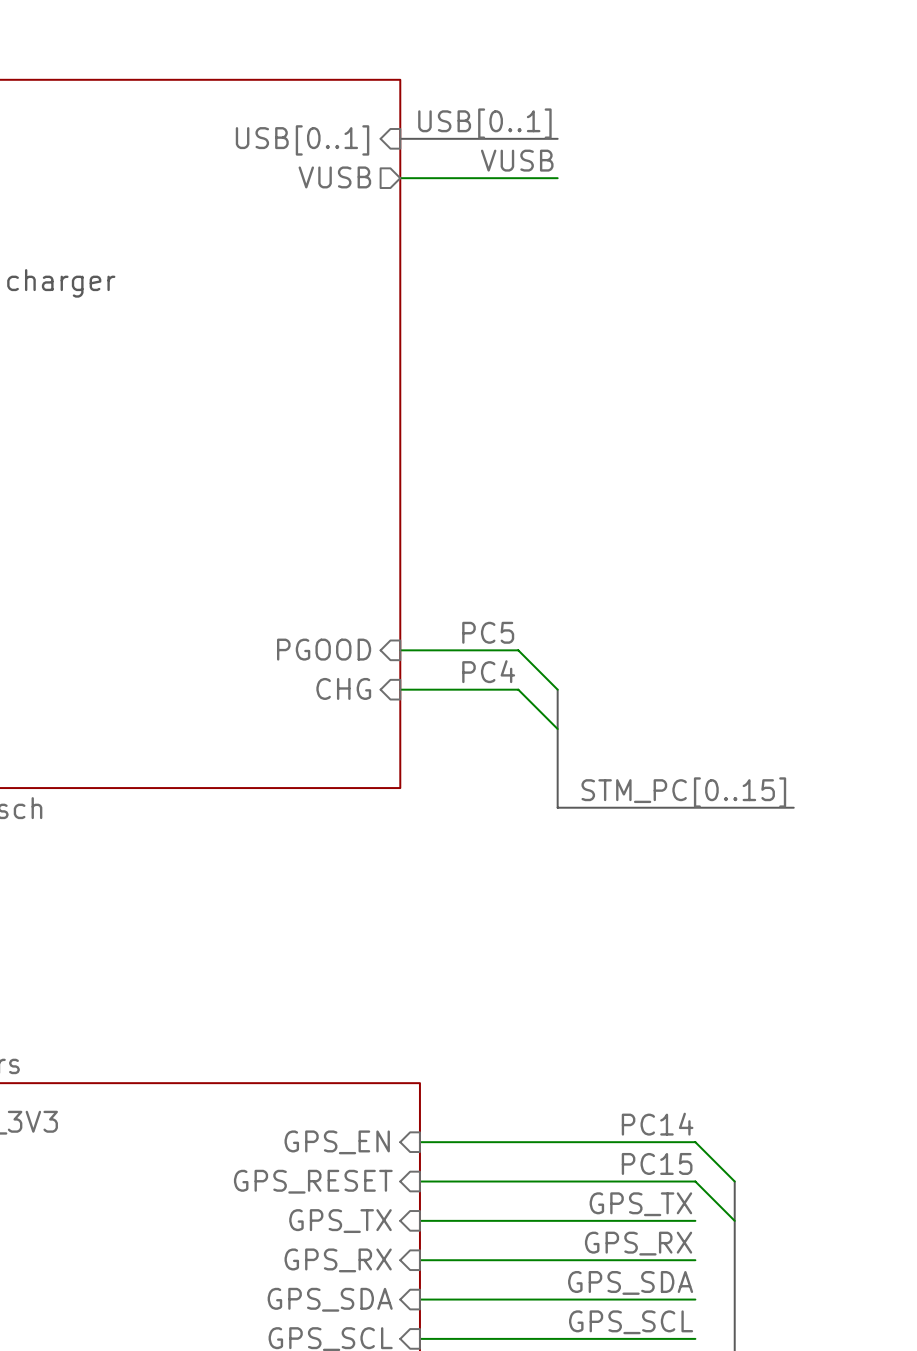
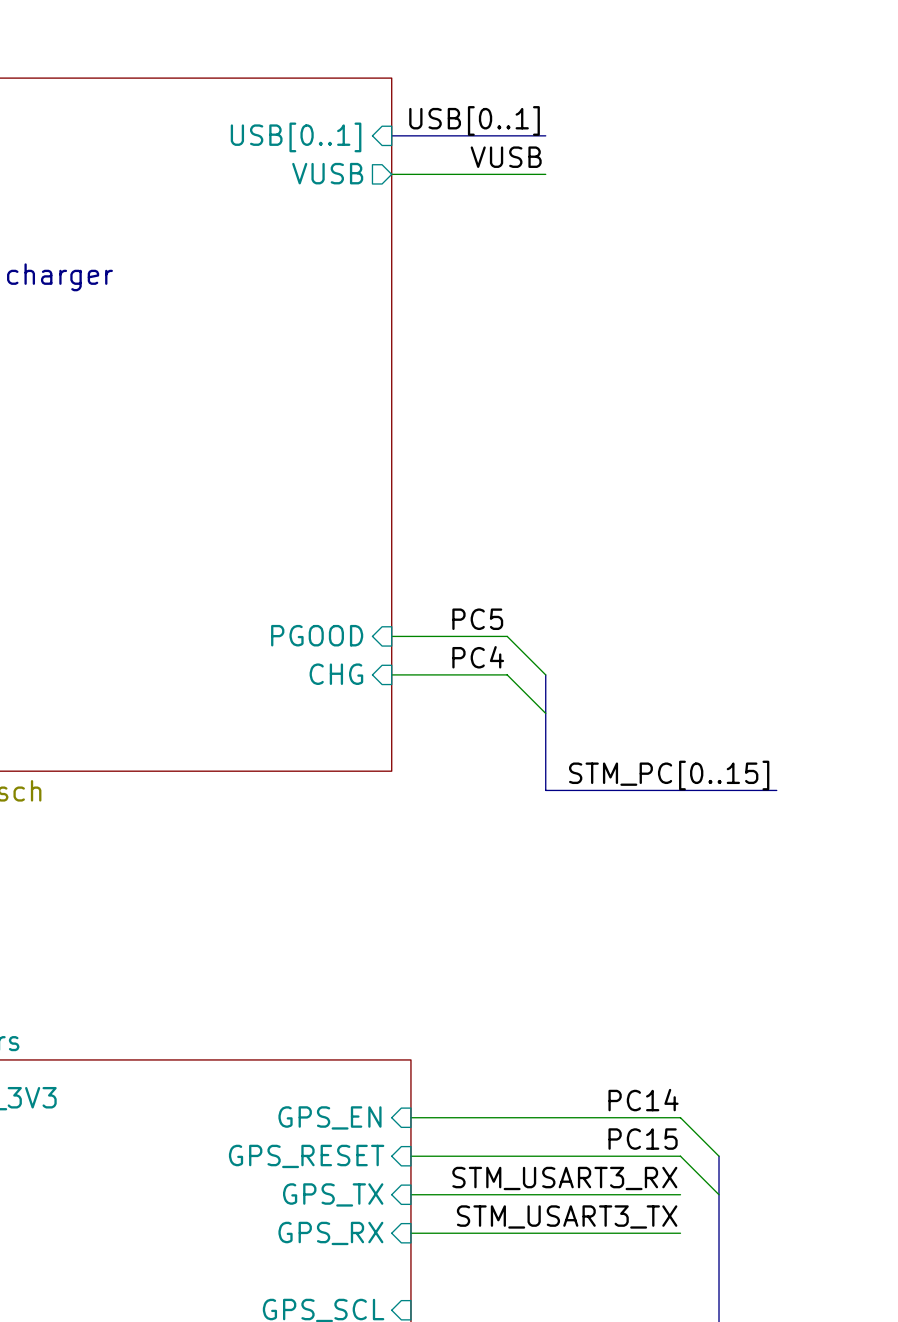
label: GPS_TX (640, 1204) -> STM_USART3_RX (564, 1178)
label: GPS_RX (638, 1243) -> STM_USART3_TX (567, 1216)
label: GPS_SDA (630, 1282) -> none
sheet pin: GPS_SDA (330, 1299) -> none
wire: (419, 1299) (695, 1299) -> none
label: GPS_SCL (631, 1322) -> none
wire: (419, 1338) (695, 1338) -> none

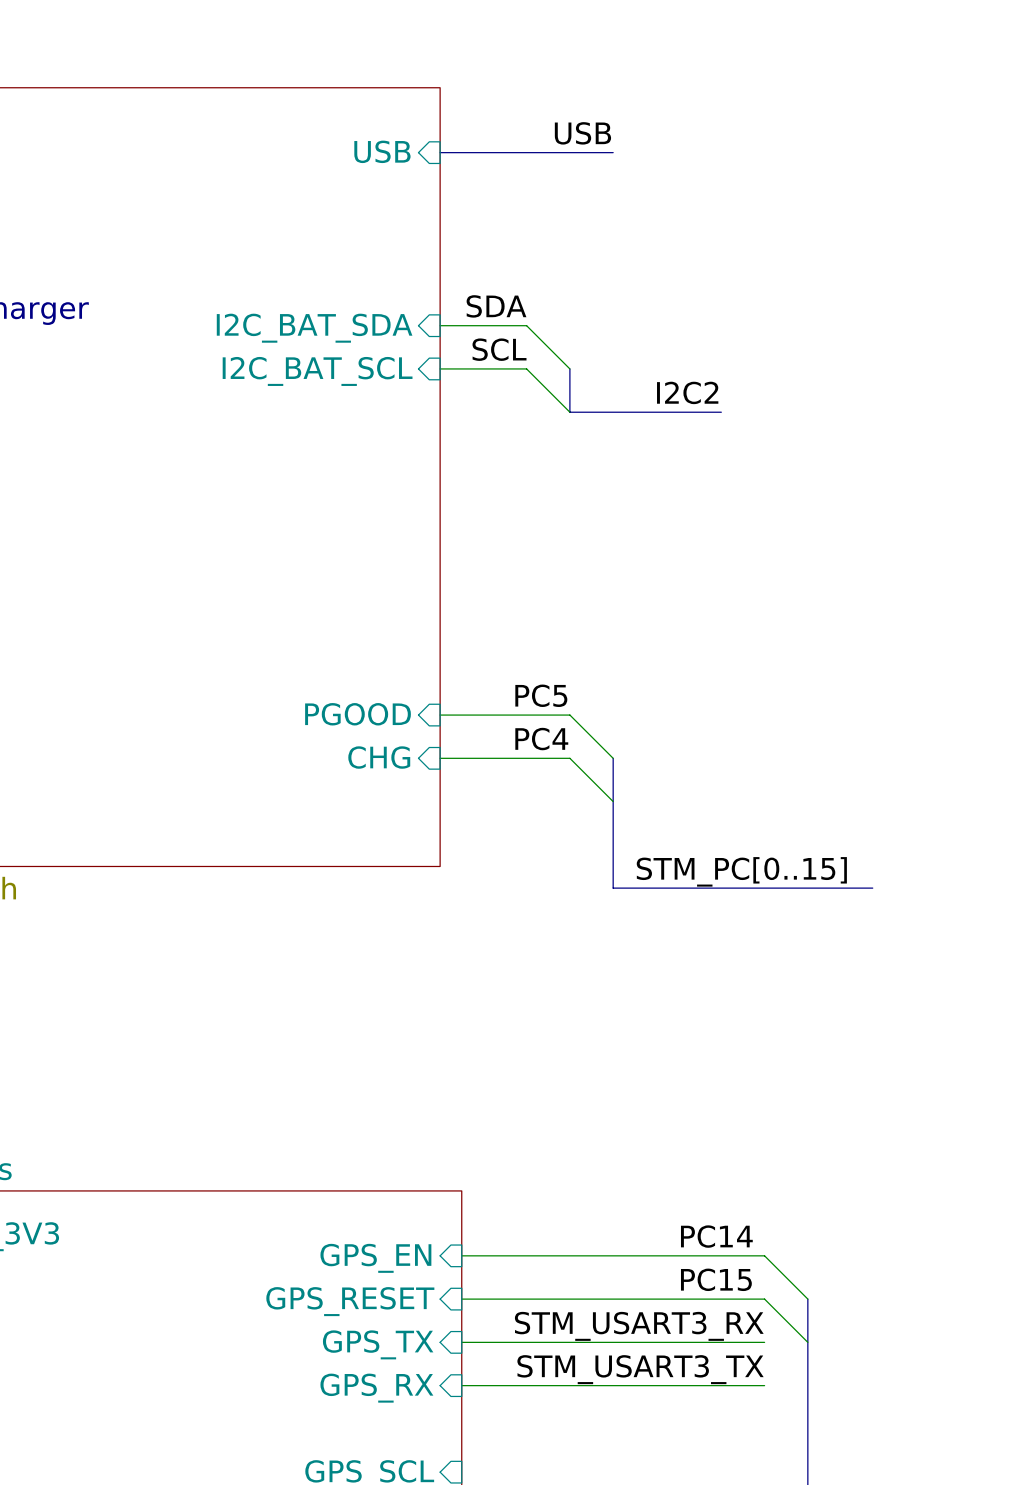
label: USB[0..1] (474, 120) -> USB (582, 133)
sheet pin: USB[0..1] (296, 137) -> USB (382, 151)
label: VUSB (506, 157) -> none
sheet pin: VUSB (327, 173) -> none
wire: (391, 174) (545, 174) -> none
label: none -> SDA (496, 306)
wire: none -> (440, 325) (526, 325) (569, 368)
sheet pin: none -> I2C_BAT_SDA (314, 328)
label: none -> SCL (499, 349)
sheet pin: none -> I2C_BAT_SCL (317, 371)
wire: none -> (440, 368) (526, 368) (569, 412)
bus: none -> (569, 368) (569, 412) (721, 412)
label: none -> I2C2 (687, 392)

